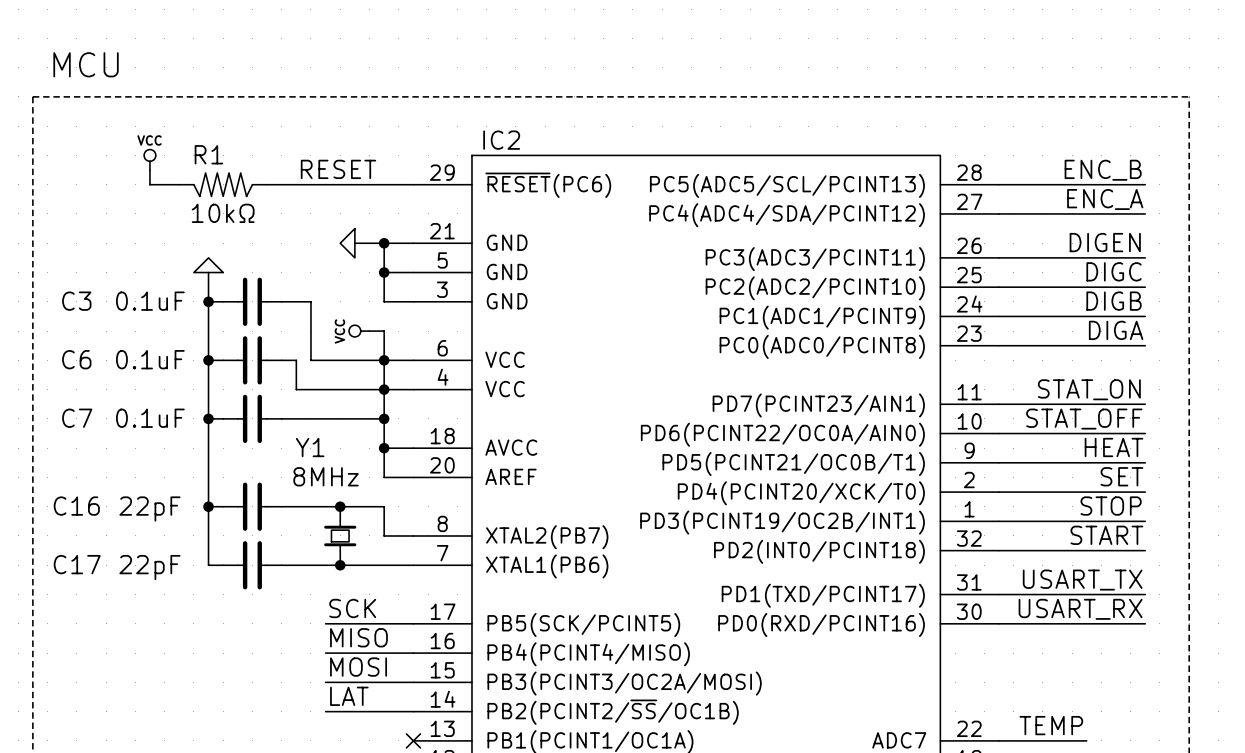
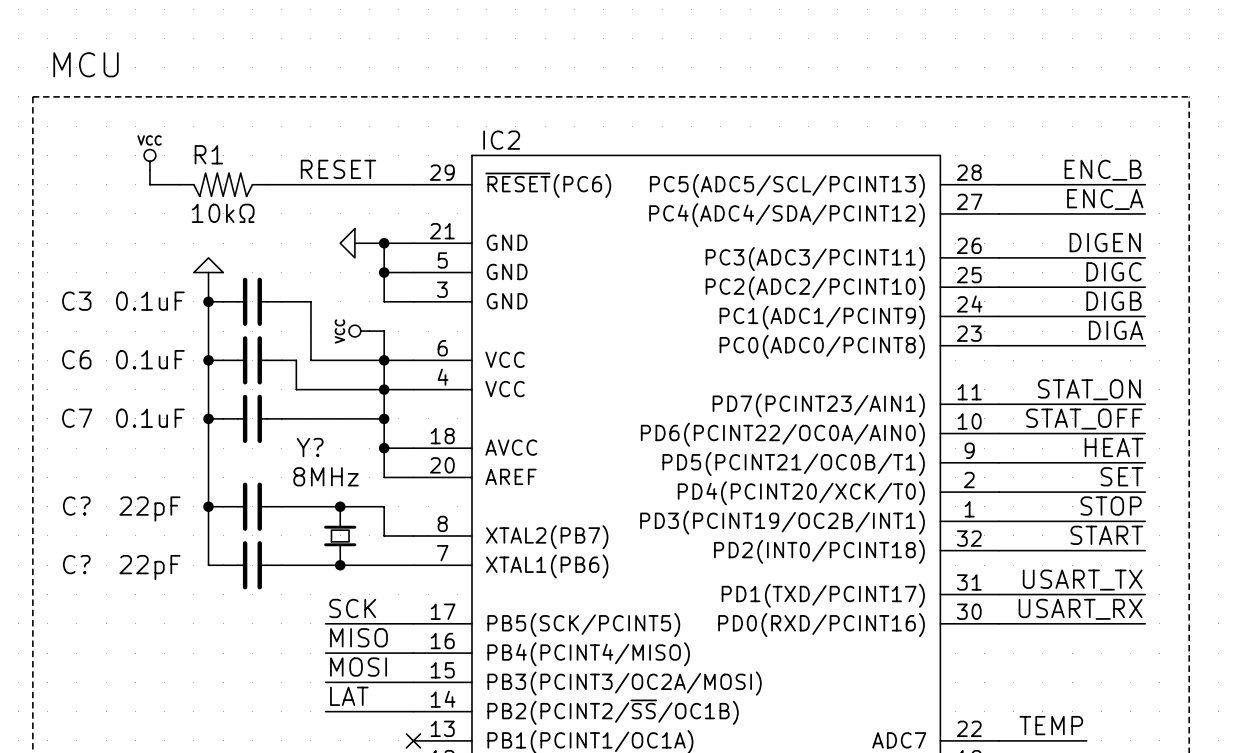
Y1 name: Y1 (310, 447) -> Y? (310, 447)
C16 name: C16 (76, 506) -> C? (76, 506)
C17 name: C17 (77, 564) -> C? (76, 564)

